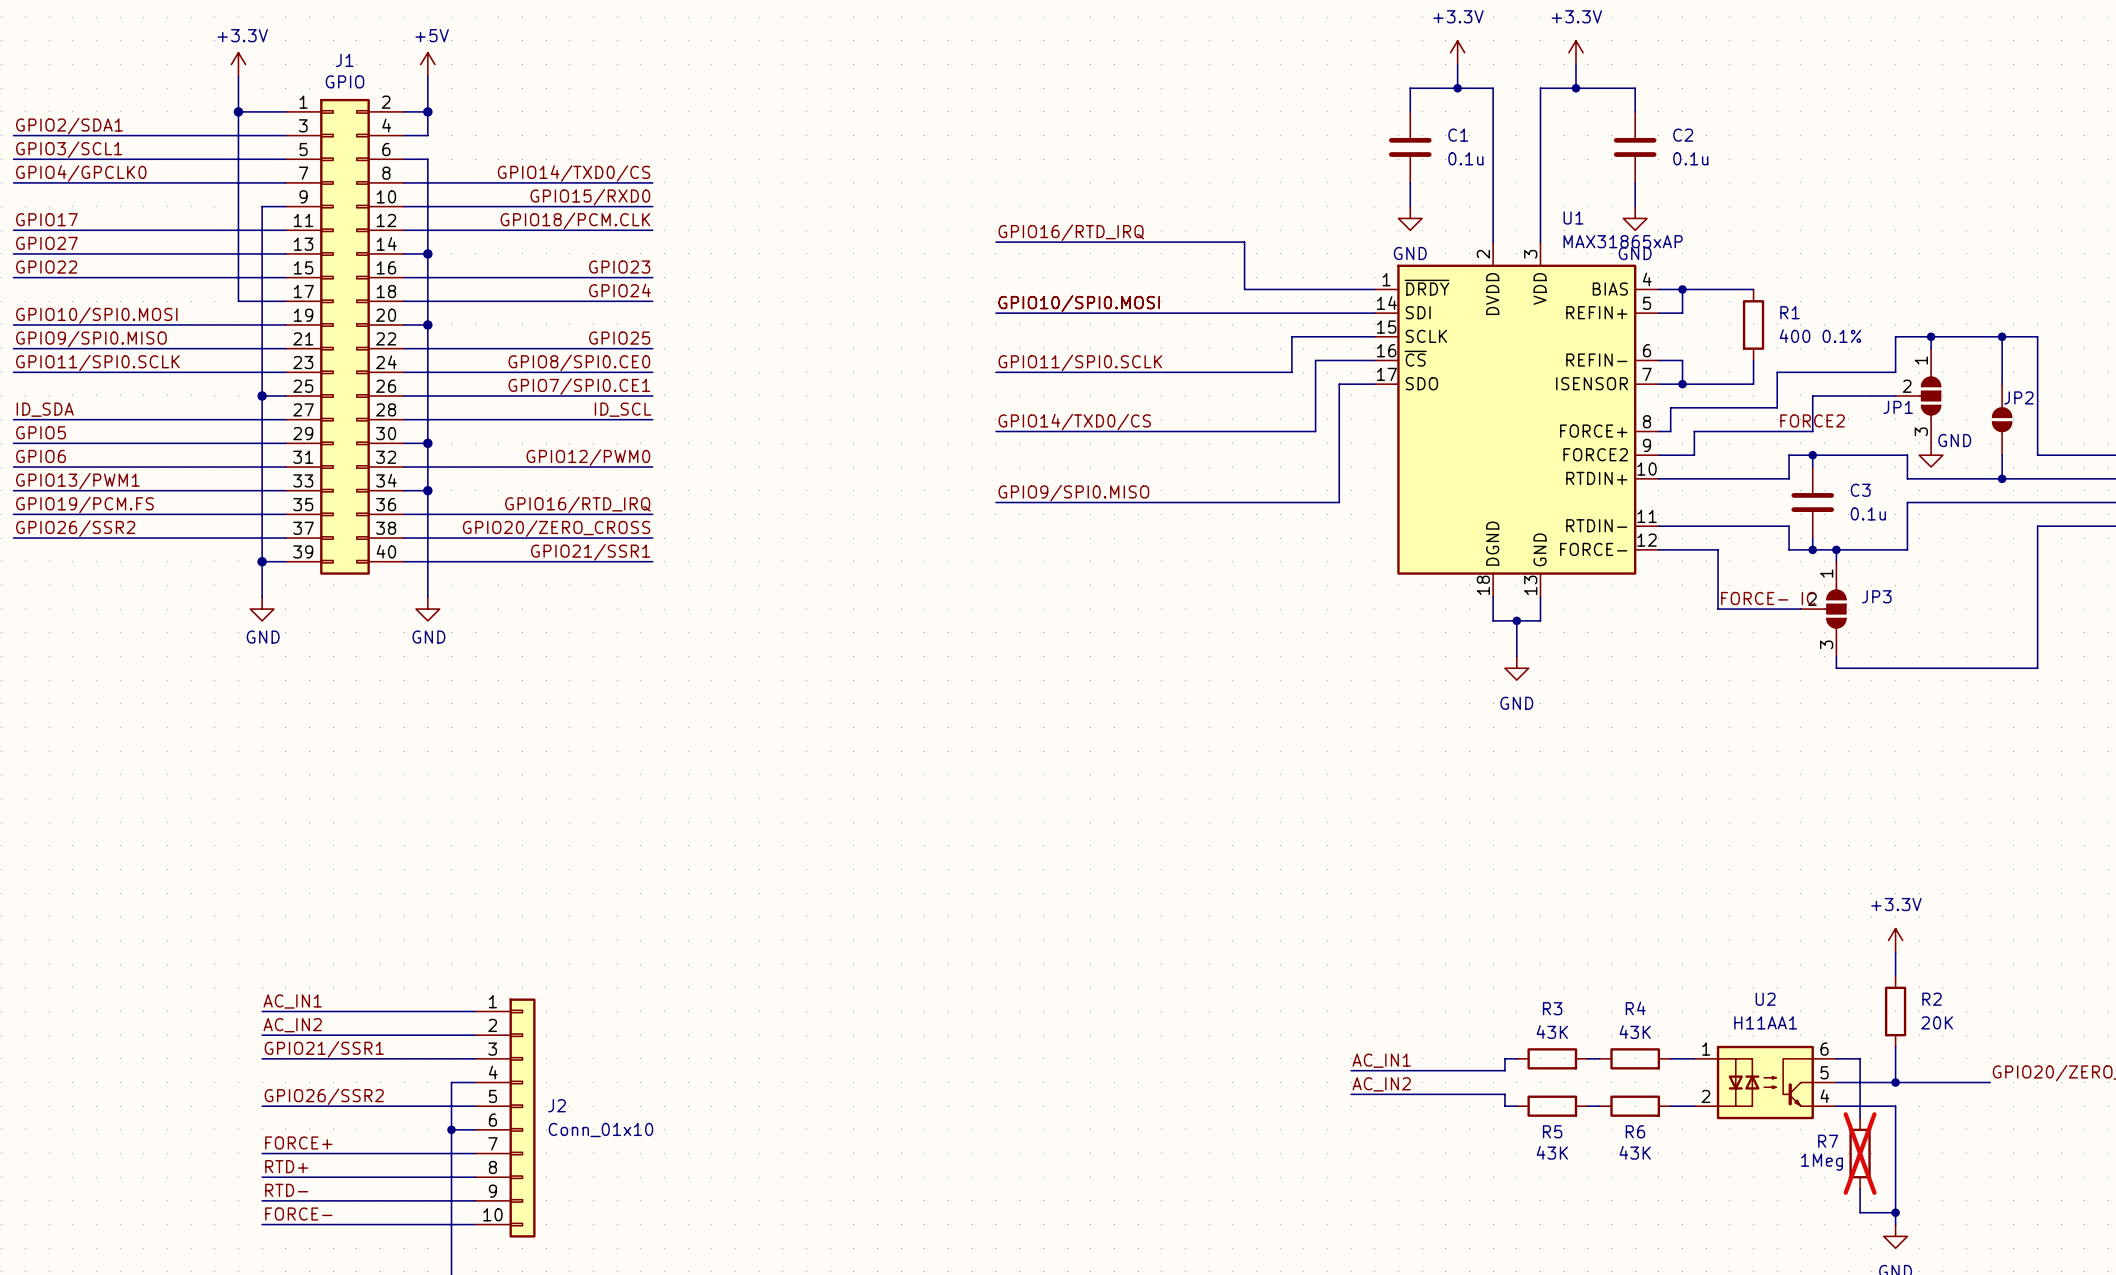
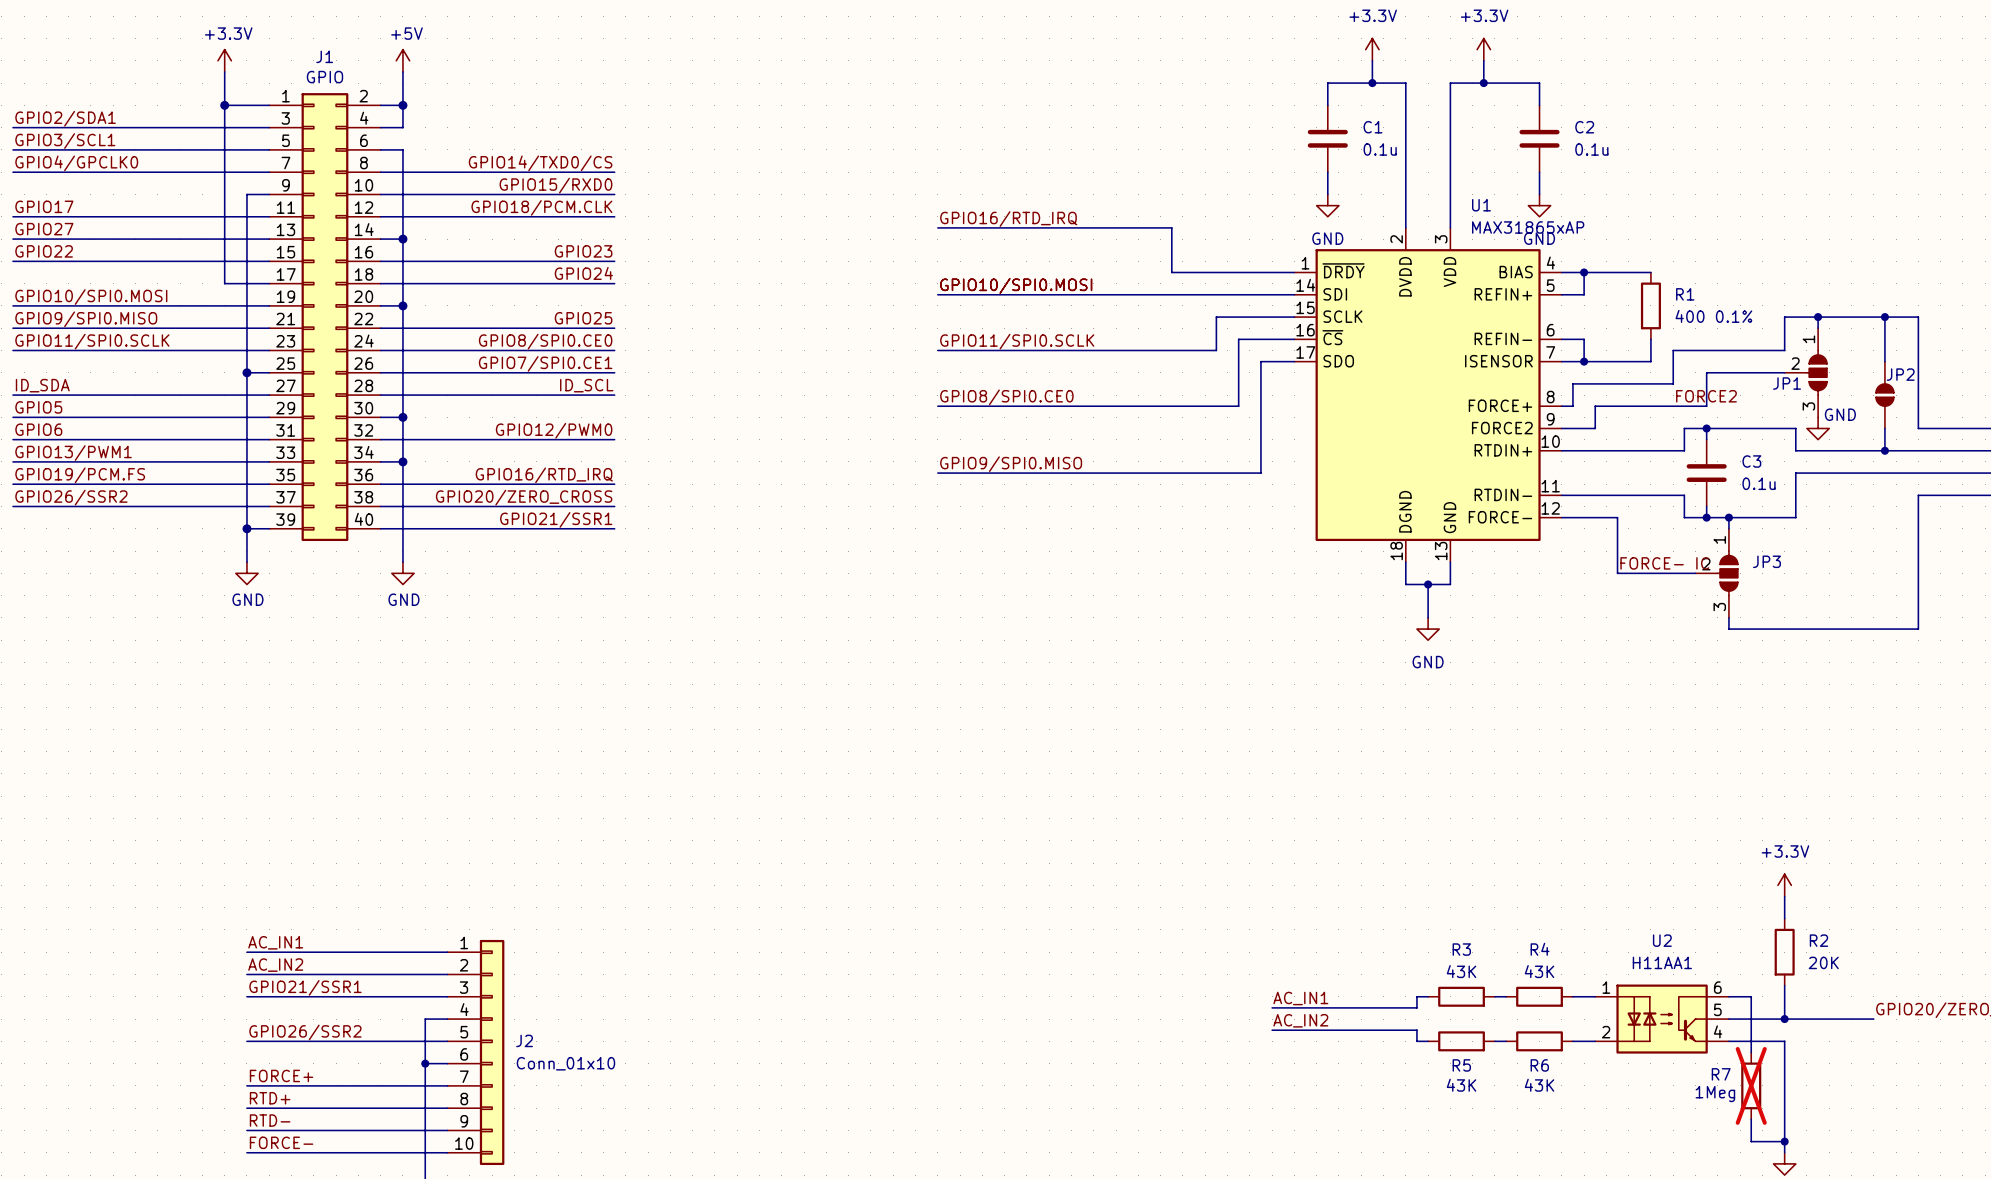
label: GPIO14/TXD0/CS (1074, 422) -> GPIO8/SPI0.CE0 (1006, 397)

